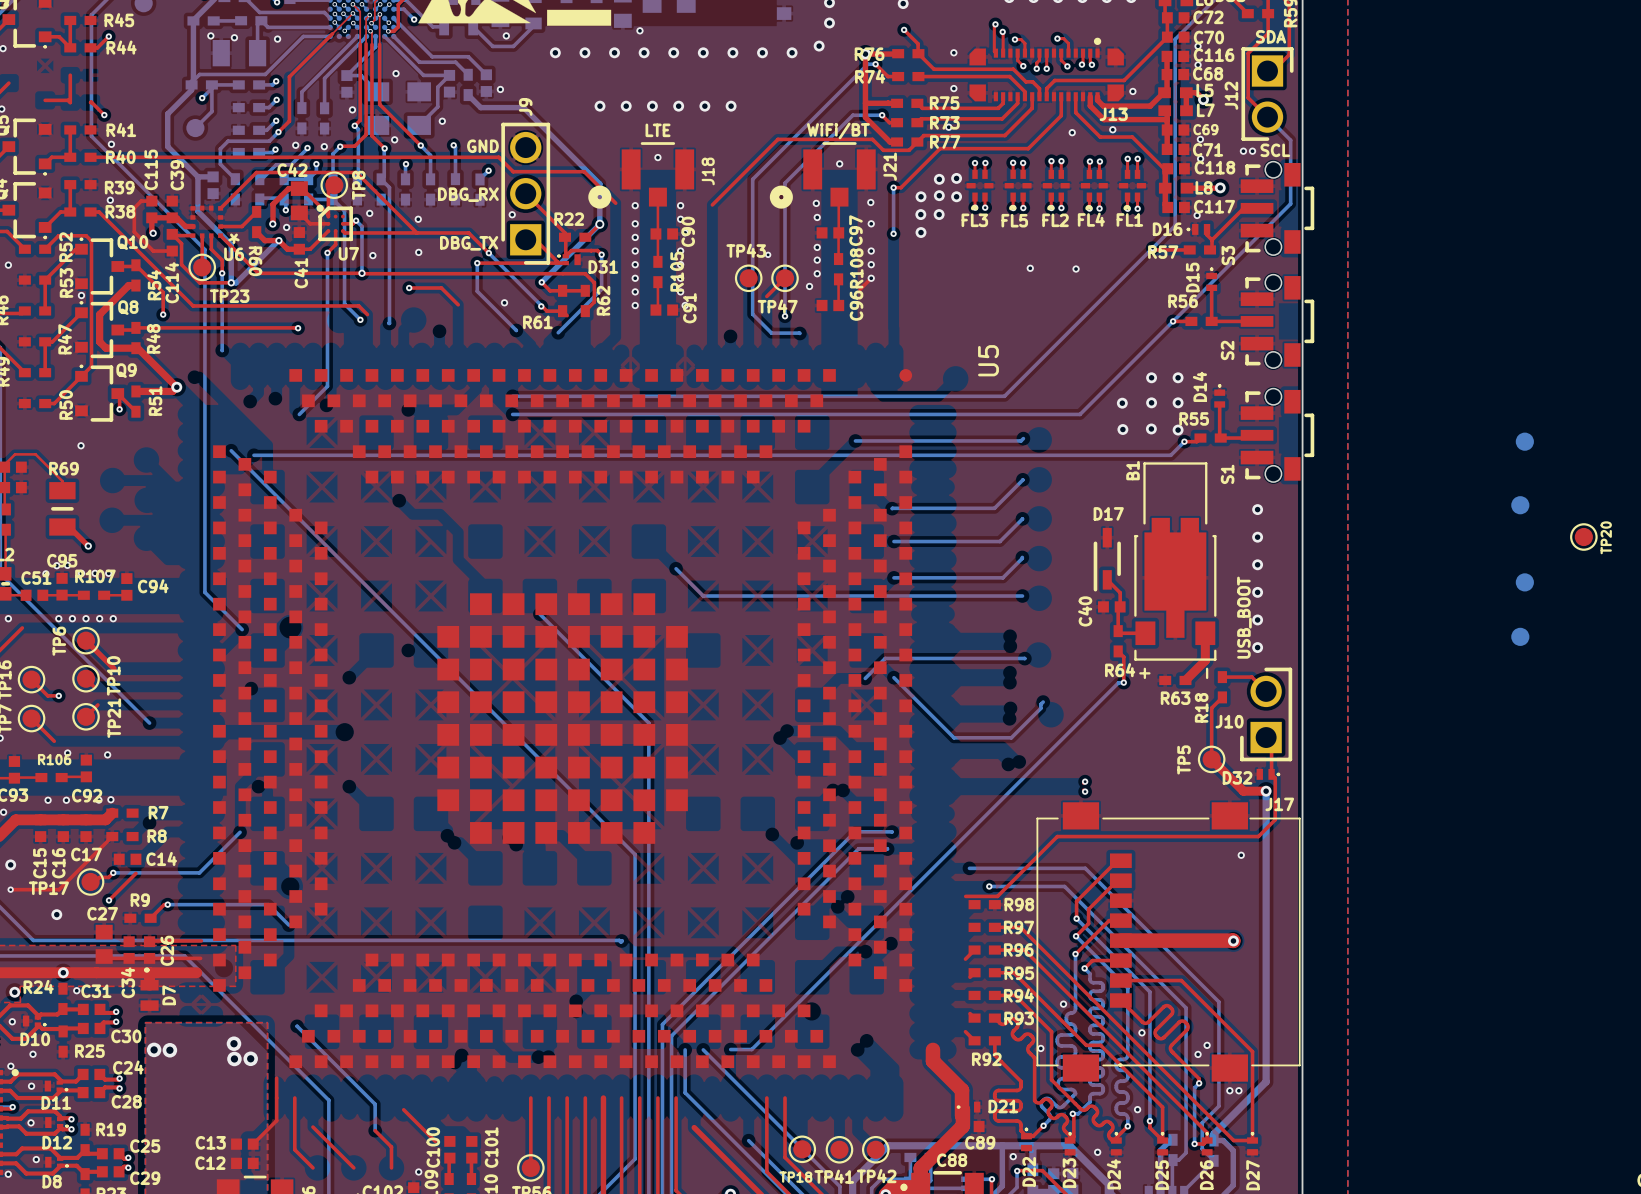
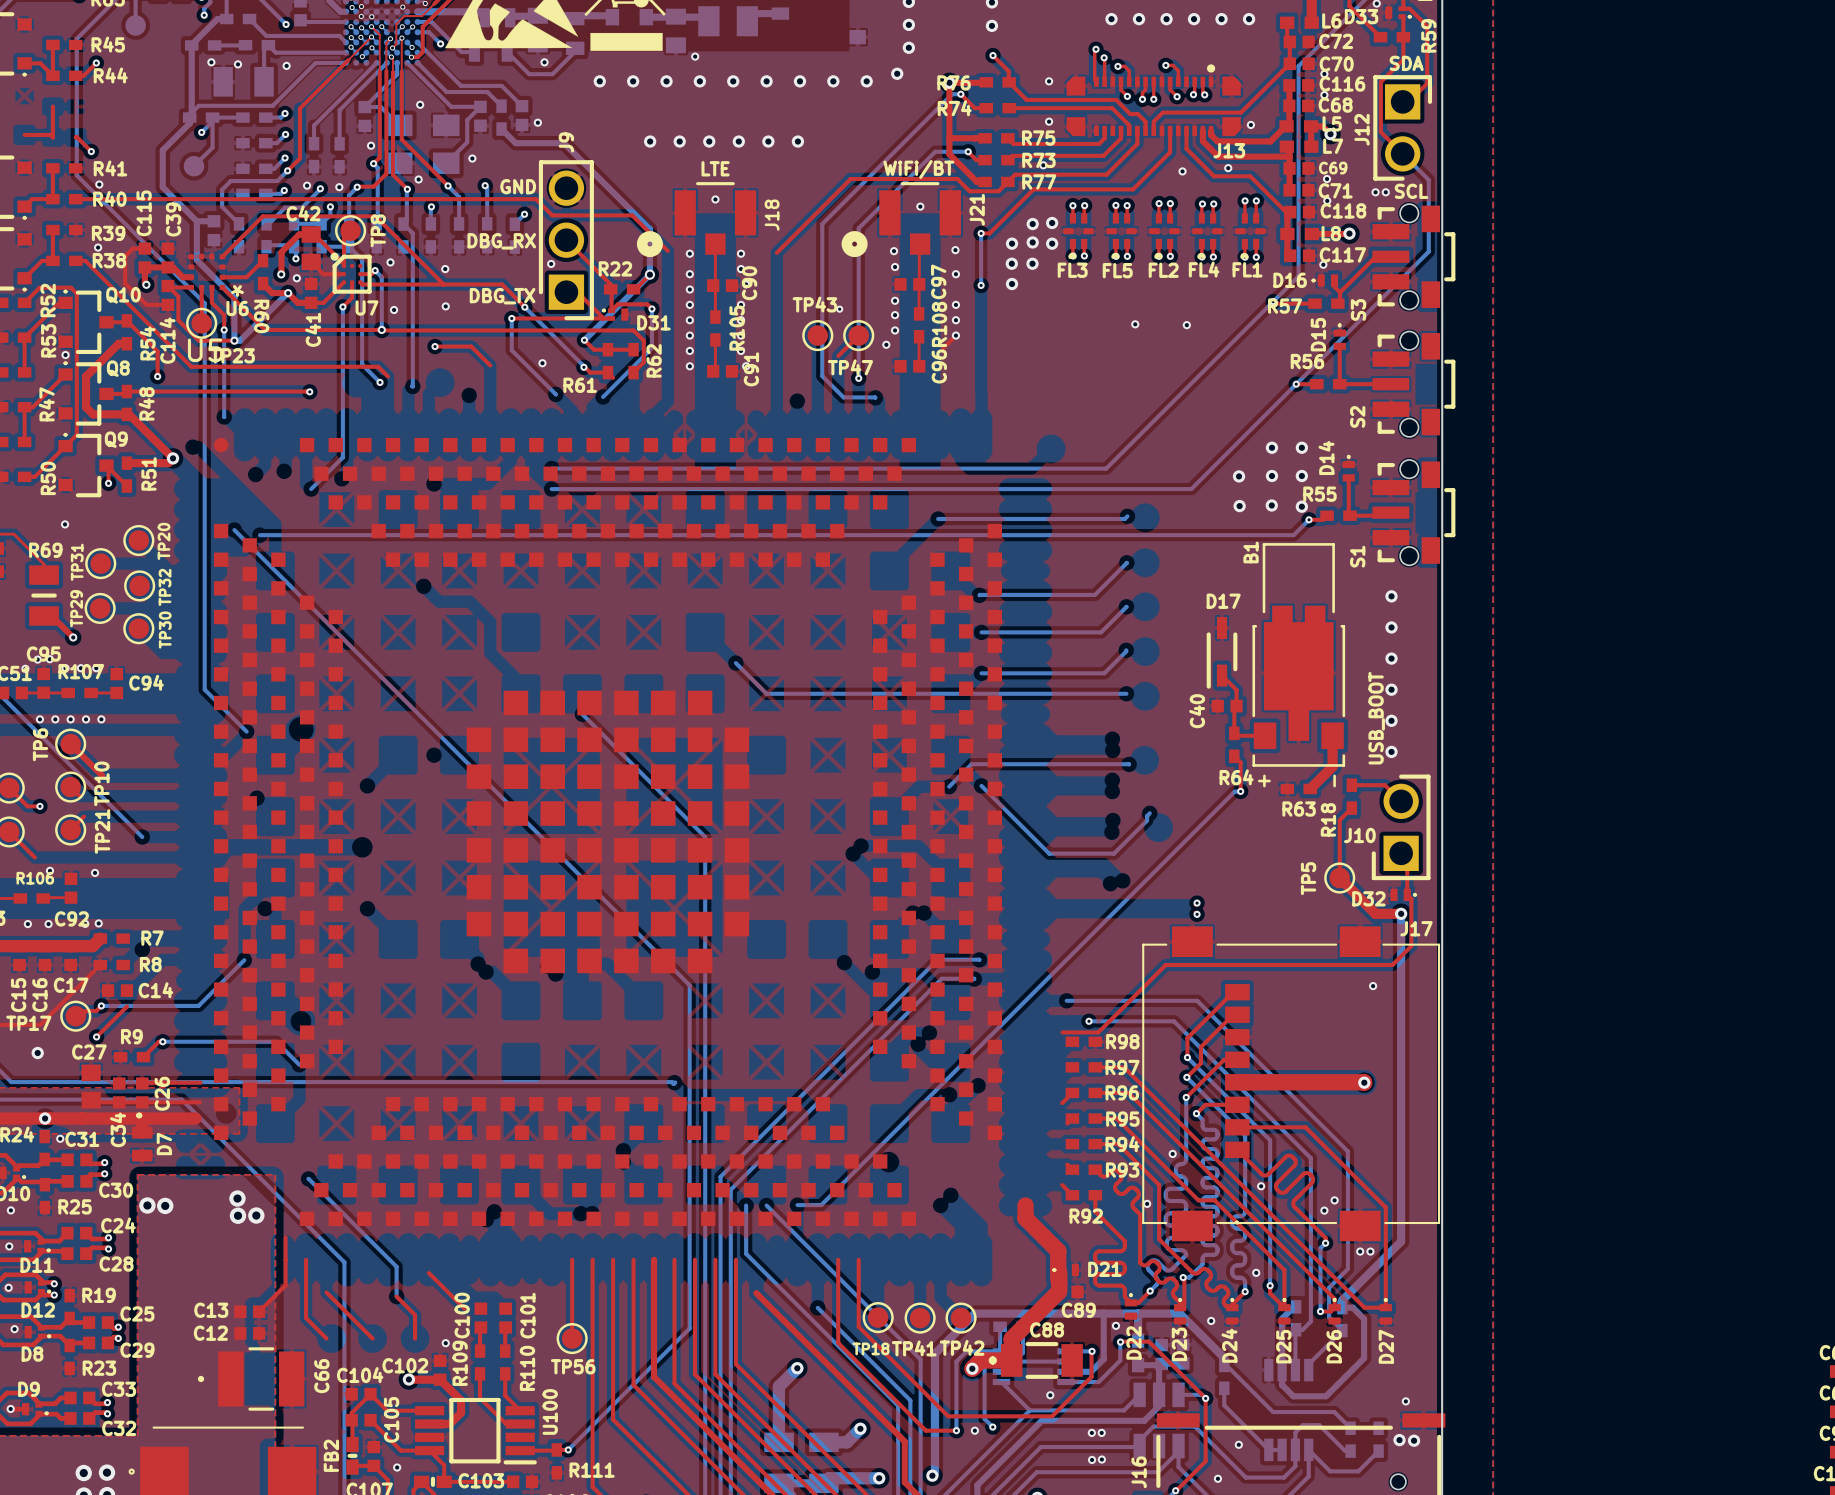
part: (1524, 441) -> none
TP31: none -> (100, 563)
TP32: none -> (139, 585)
part: (1520, 505) -> none
TP29: none -> (100, 608)
TP20 position: (1583, 537) -> (138, 540)
TP30: none -> (138, 628)
part: (1524, 582) -> none
part: (1520, 636) -> none
U5 rotation: 0° (562, 718) -> 90° counterclockwise (607, 831)

